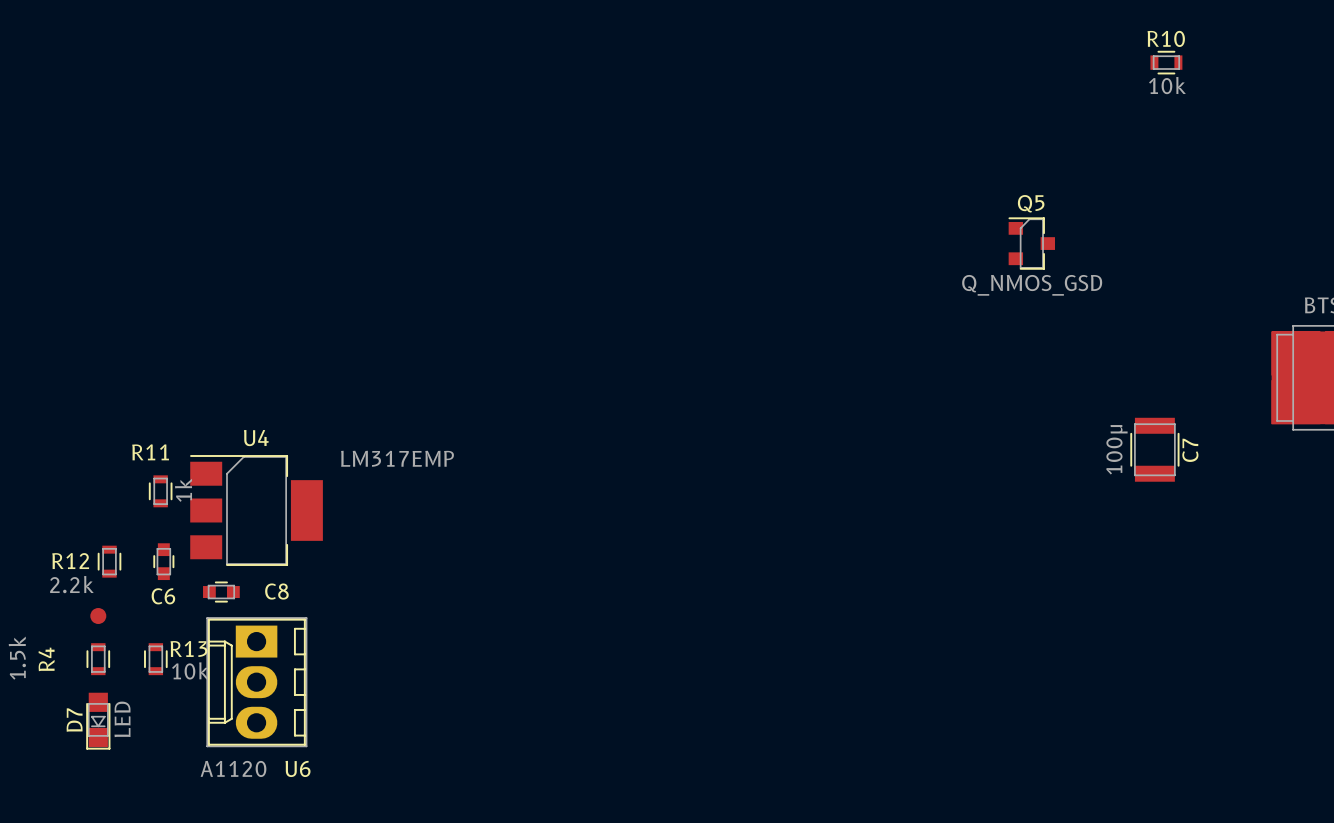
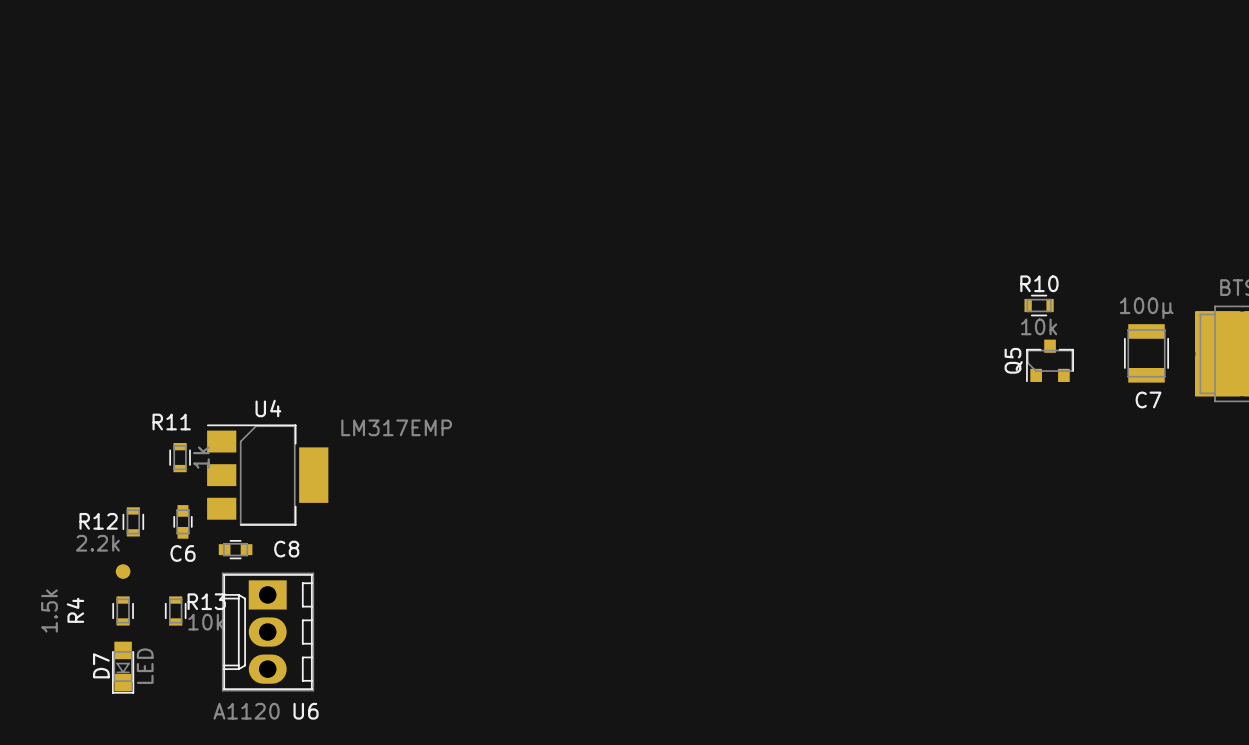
R10 position: (1166, 62) -> (1039, 305)
Q5 rotation: 0° (1031, 243) -> 90° counterclockwise (1050, 360)
Q5 position: (1031, 243) -> (1050, 360)
Q5 value: Q_NMOS_GSD (1032, 285) -> none
C7 value rotation: 0° (1116, 449) -> 90° clockwise (1146, 308)
C7 position: (1154, 449) -> (1146, 353)
C7 name rotation: 0° (1190, 450) -> 90° clockwise (1148, 399)

